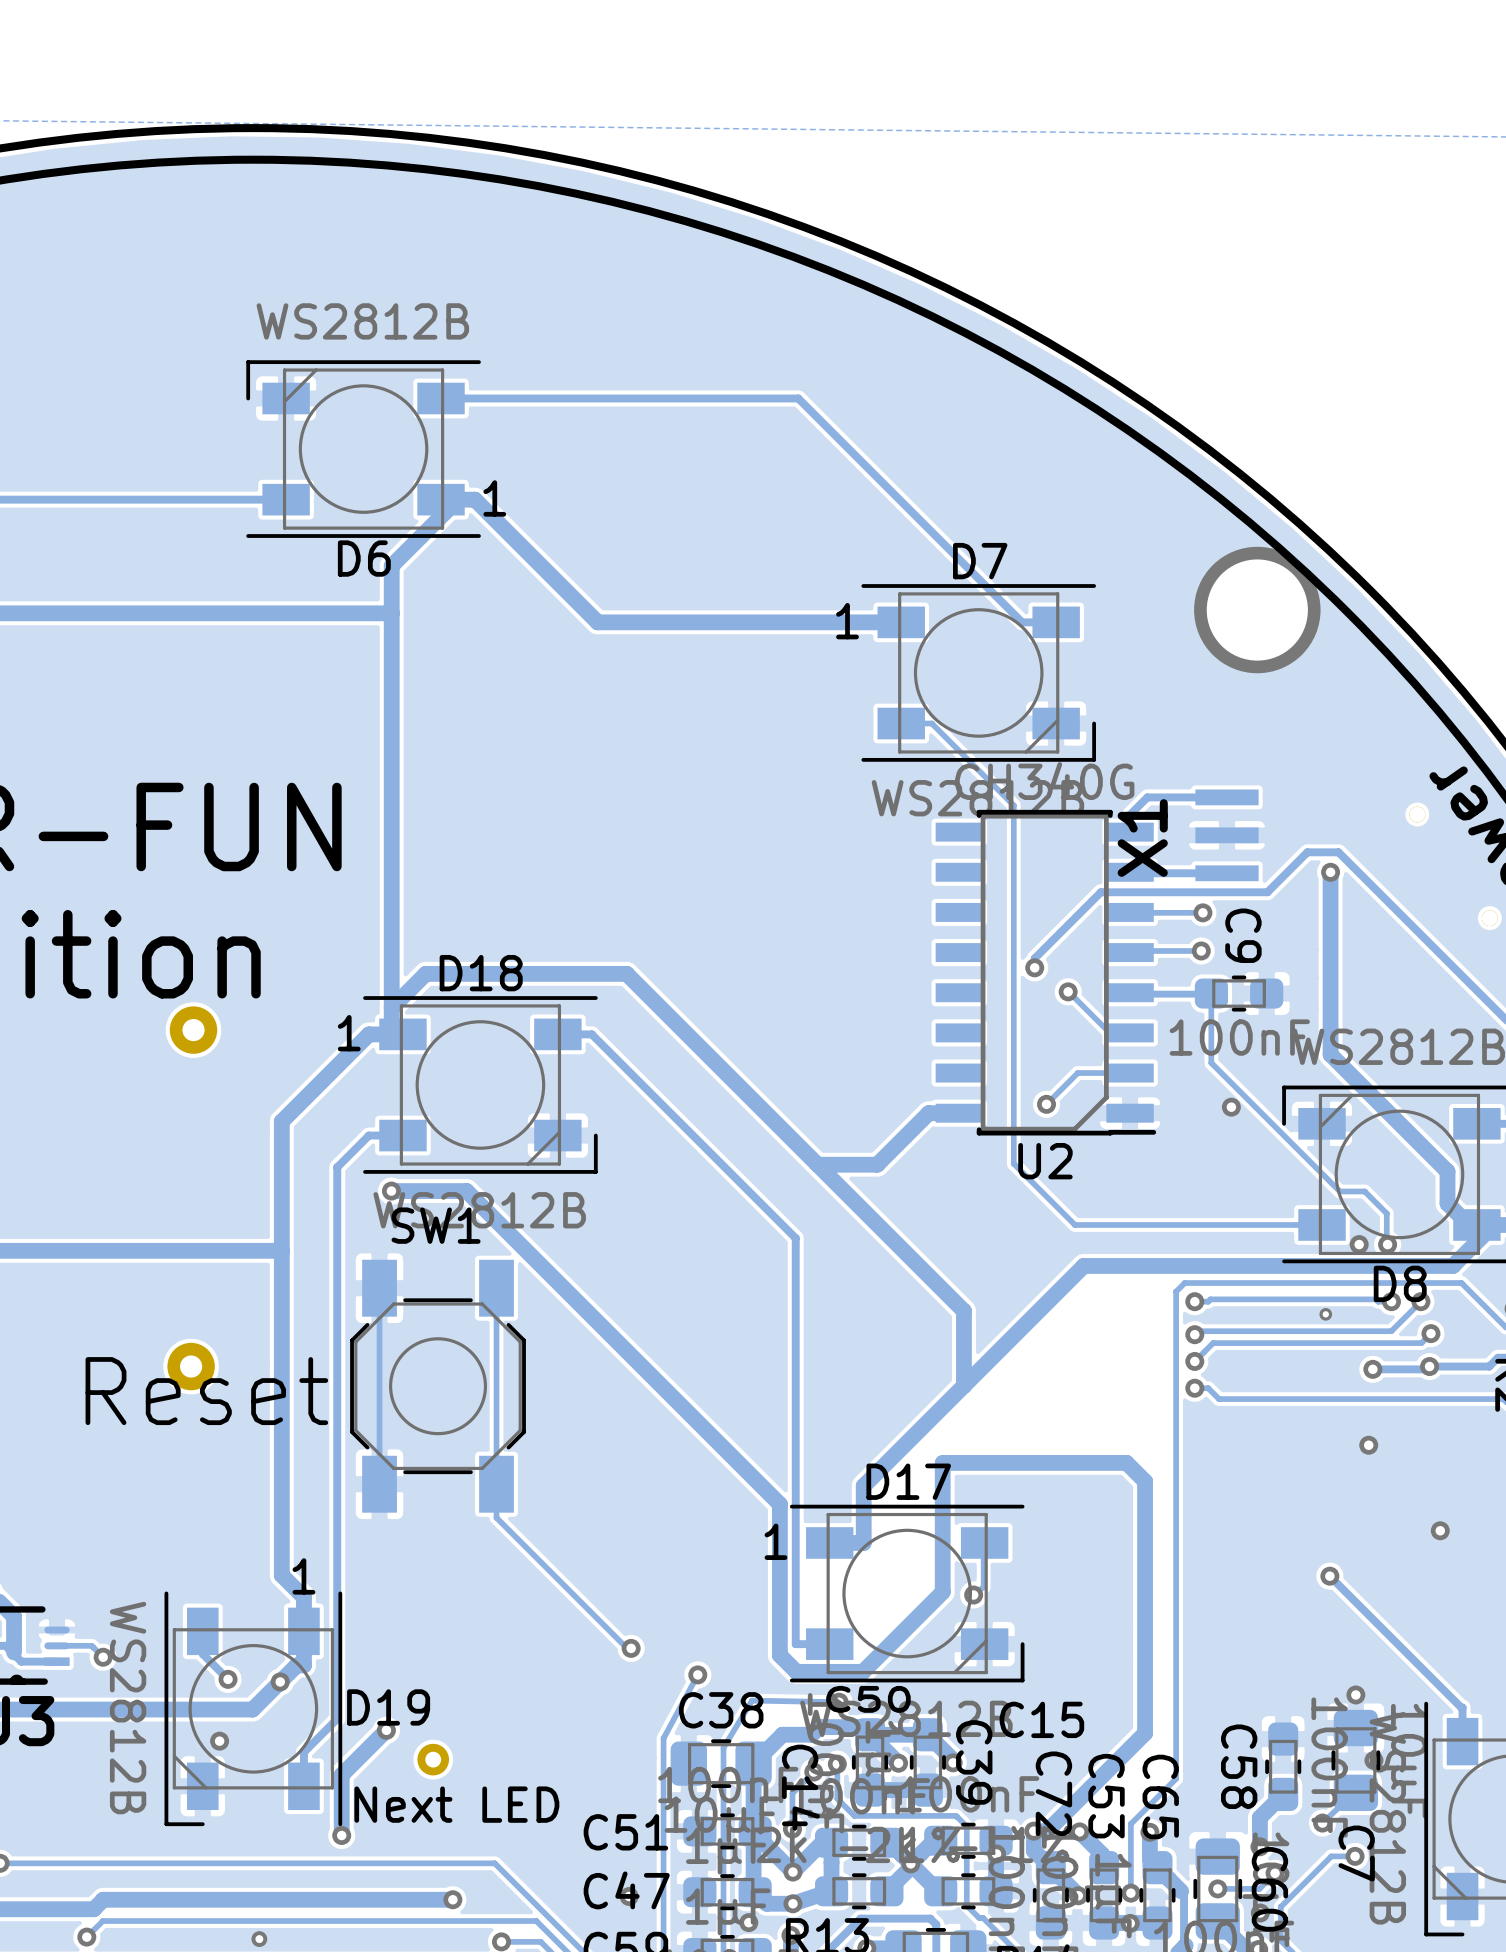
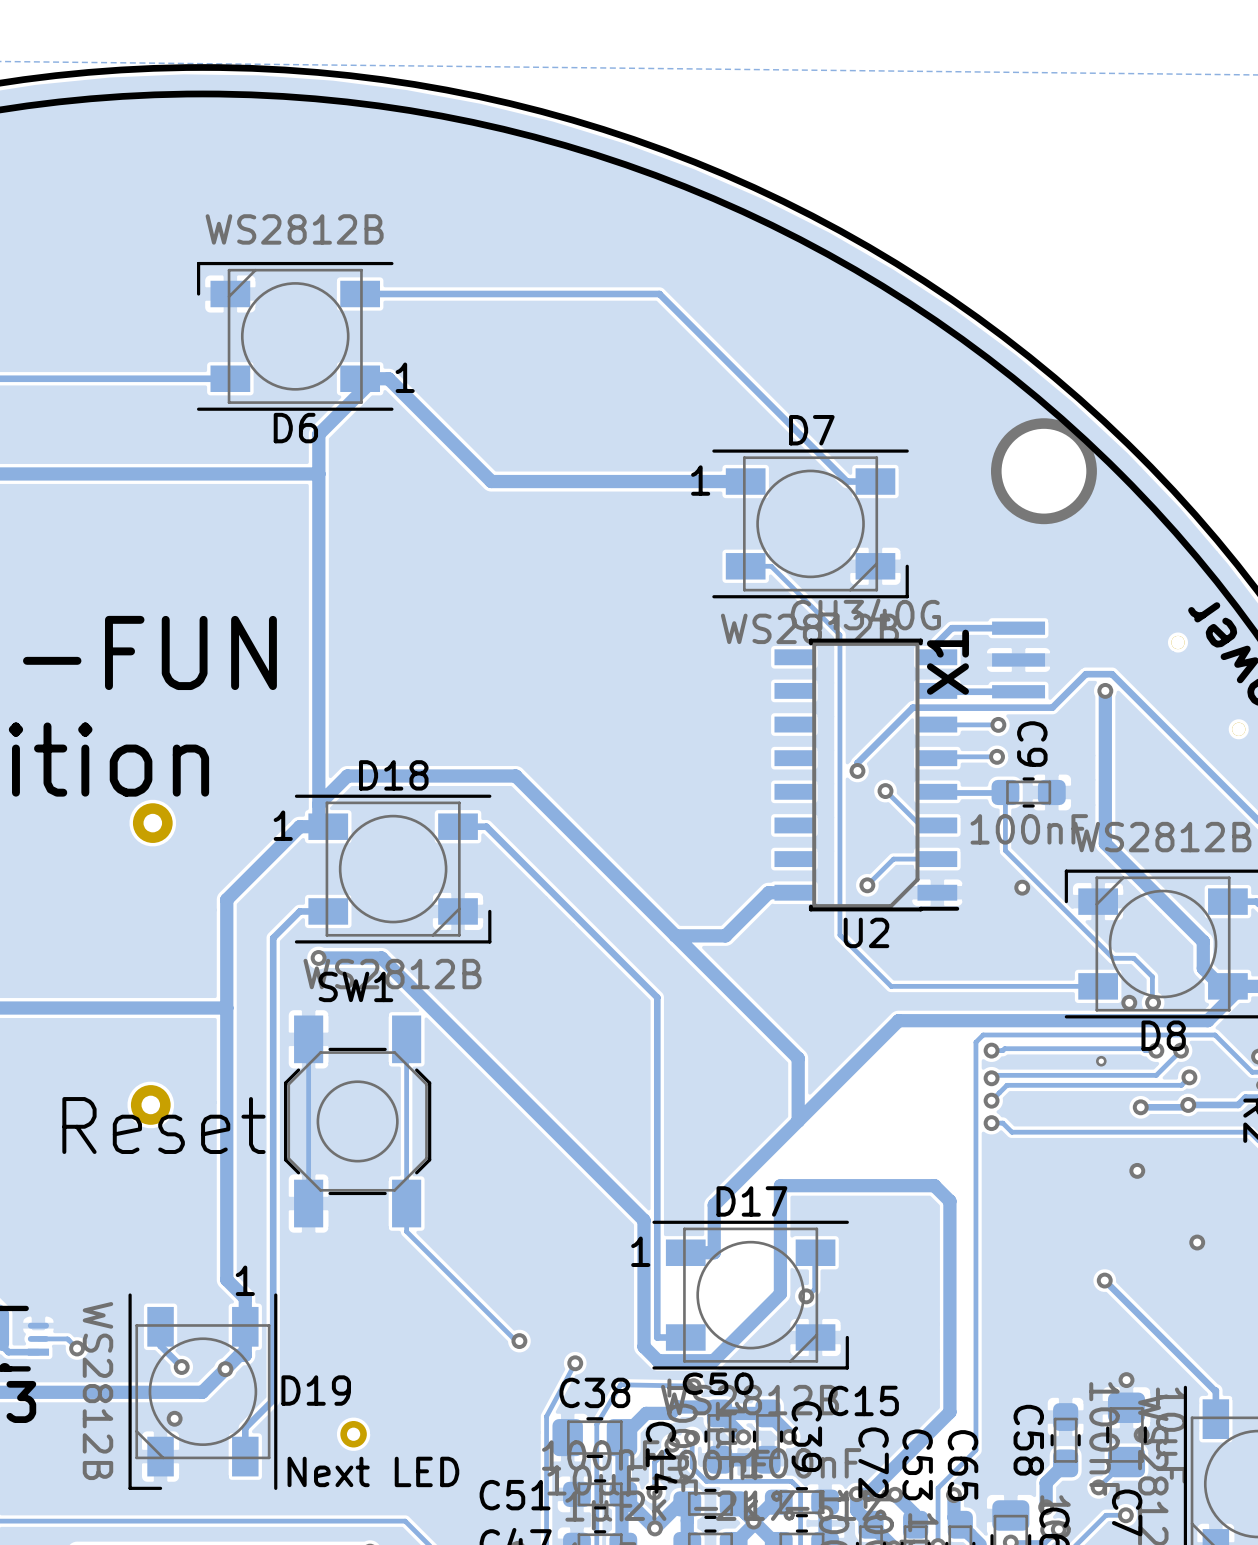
track: (386, 1730) (341, 1775) (341, 1835) -> none
via: (386, 1730) -> none
via: (341, 1835) -> none

